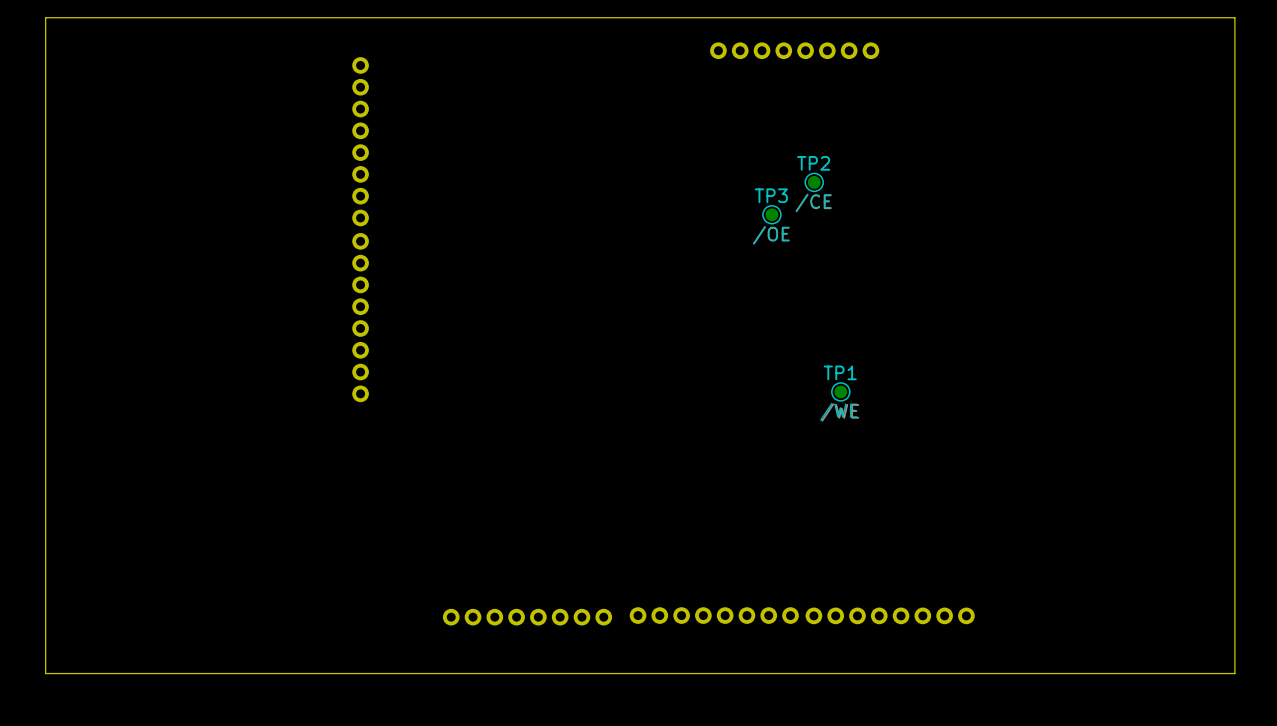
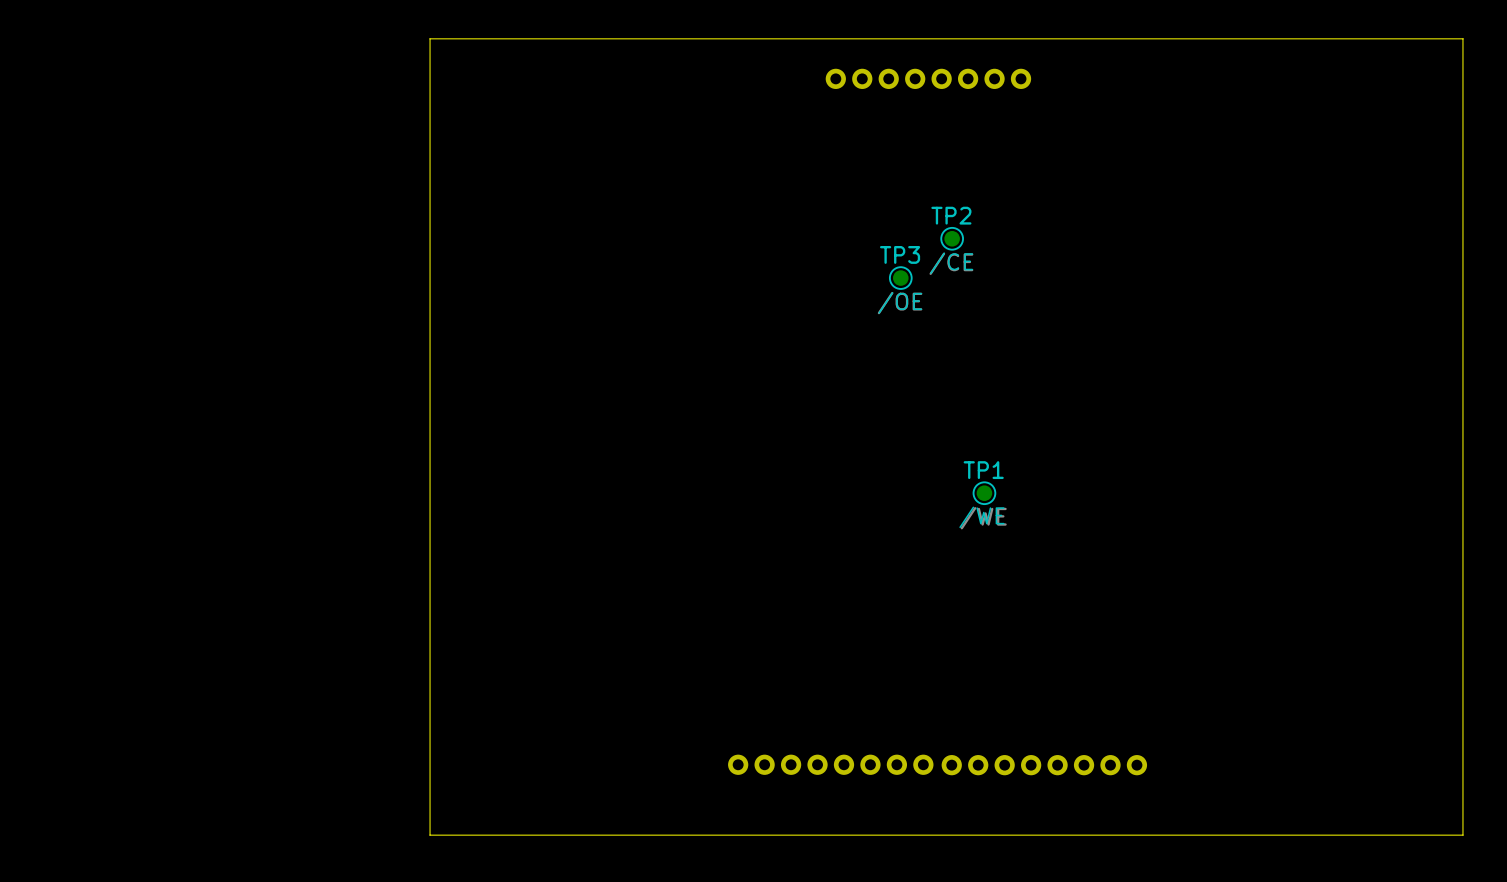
board edge: (384, 17) (45, 17) (45, 673) (384, 673) -> (430, 38) (430, 835)
part: (360, 141) -> none
part: (360, 317) -> none
part: (527, 617) -> none

